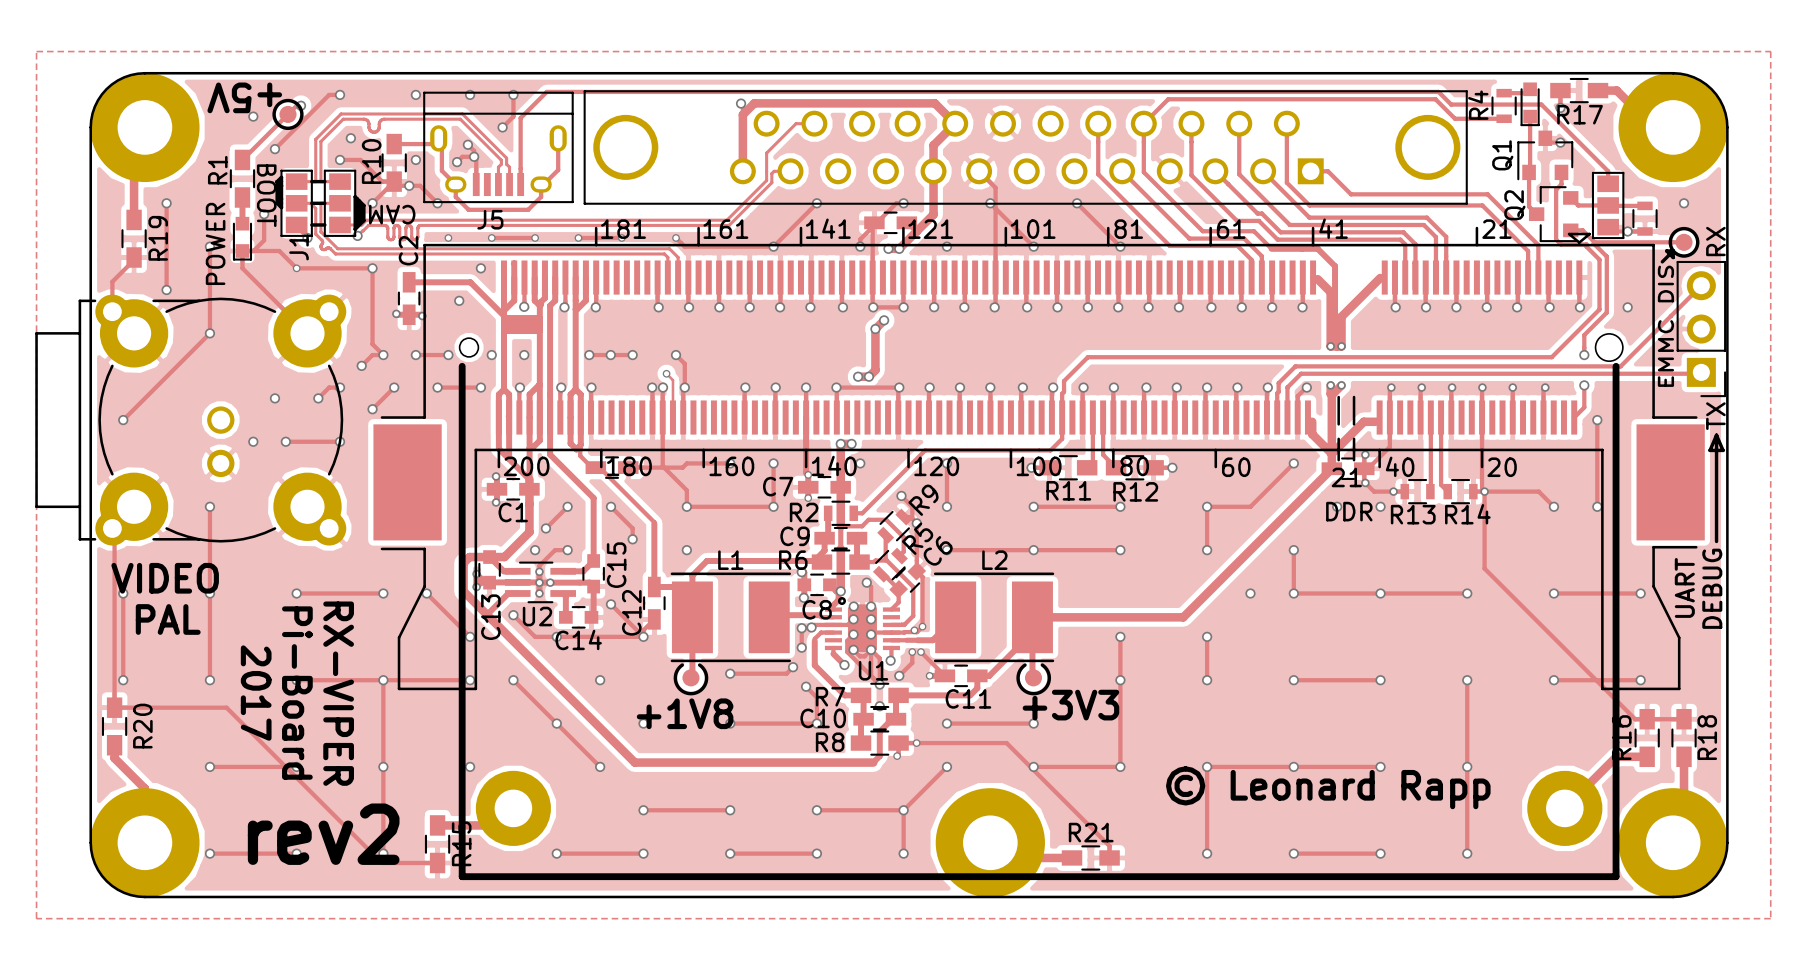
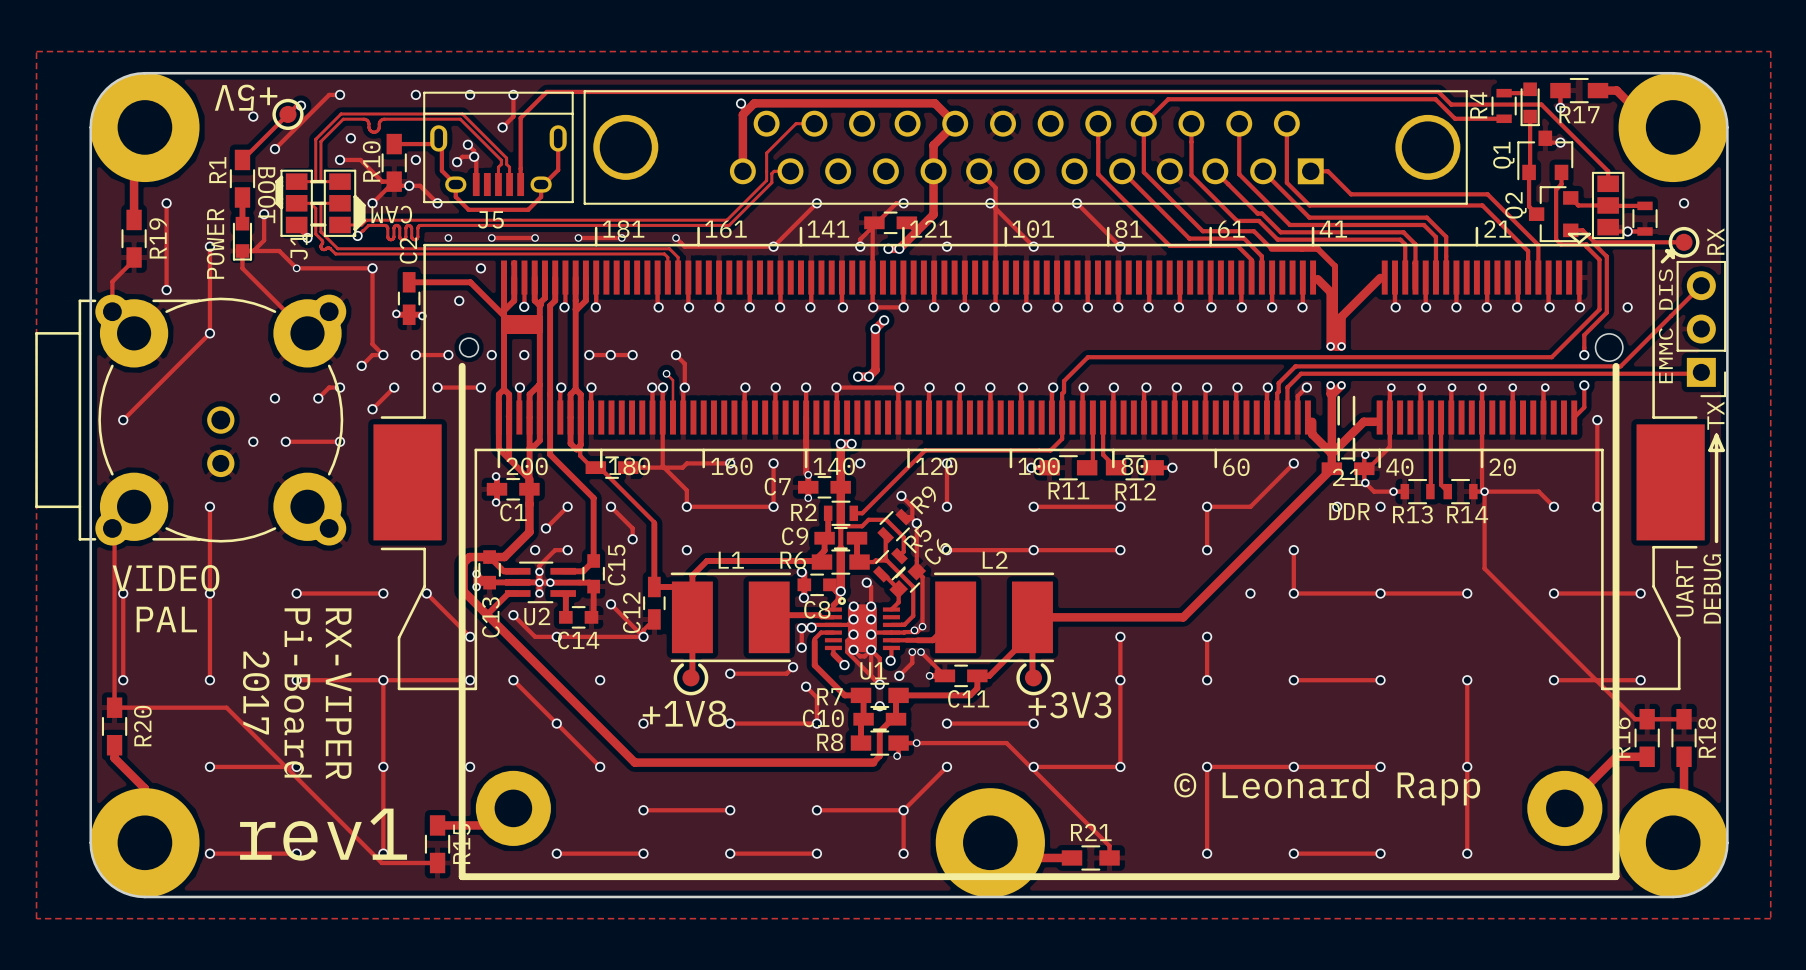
text: rev2 (323, 834) -> rev1 (323, 834)

